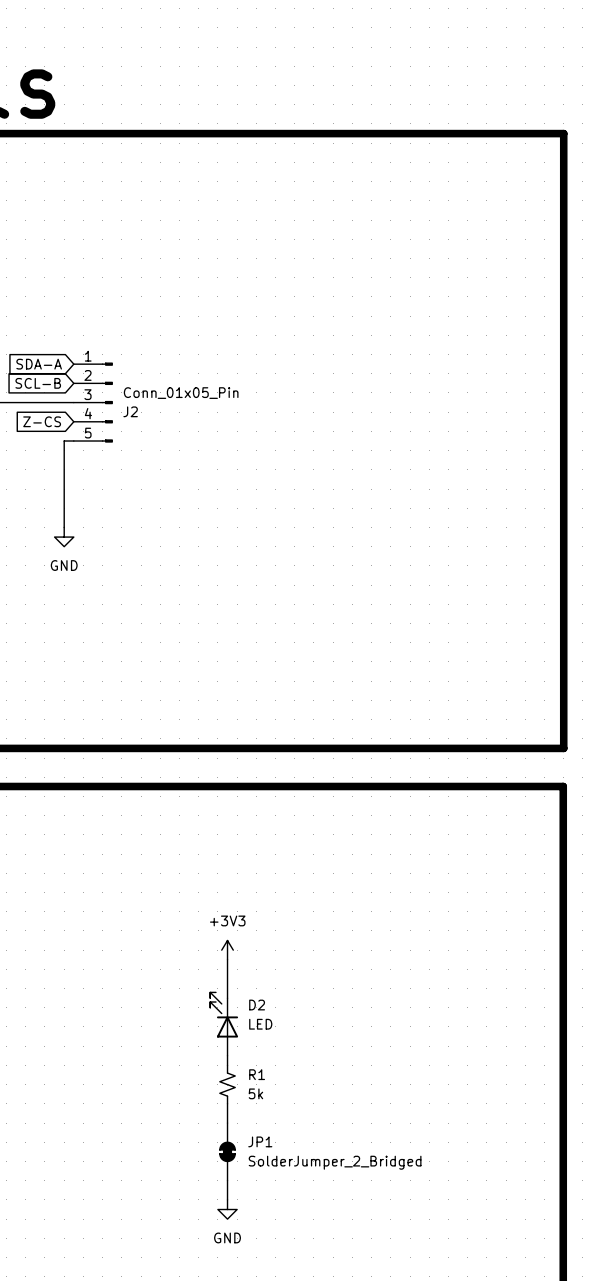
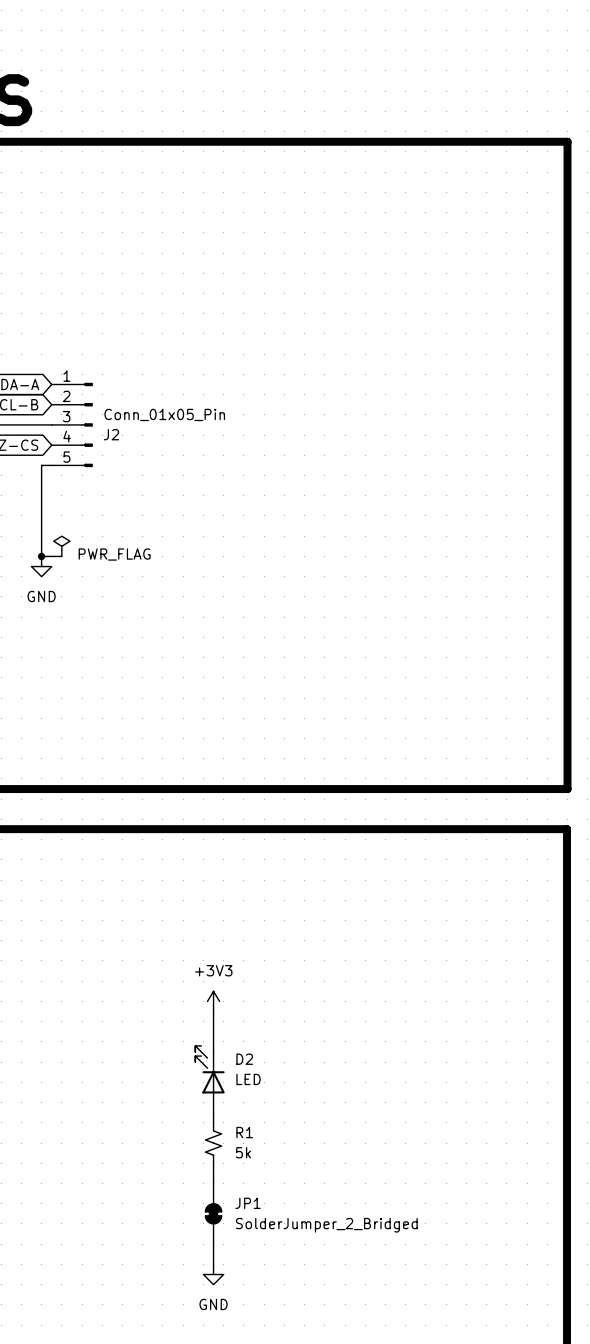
power symbol: none -> PWR_FLAG (61, 546)
wire: none -> (41, 556) (61, 556)
junction: none -> (41, 556)

